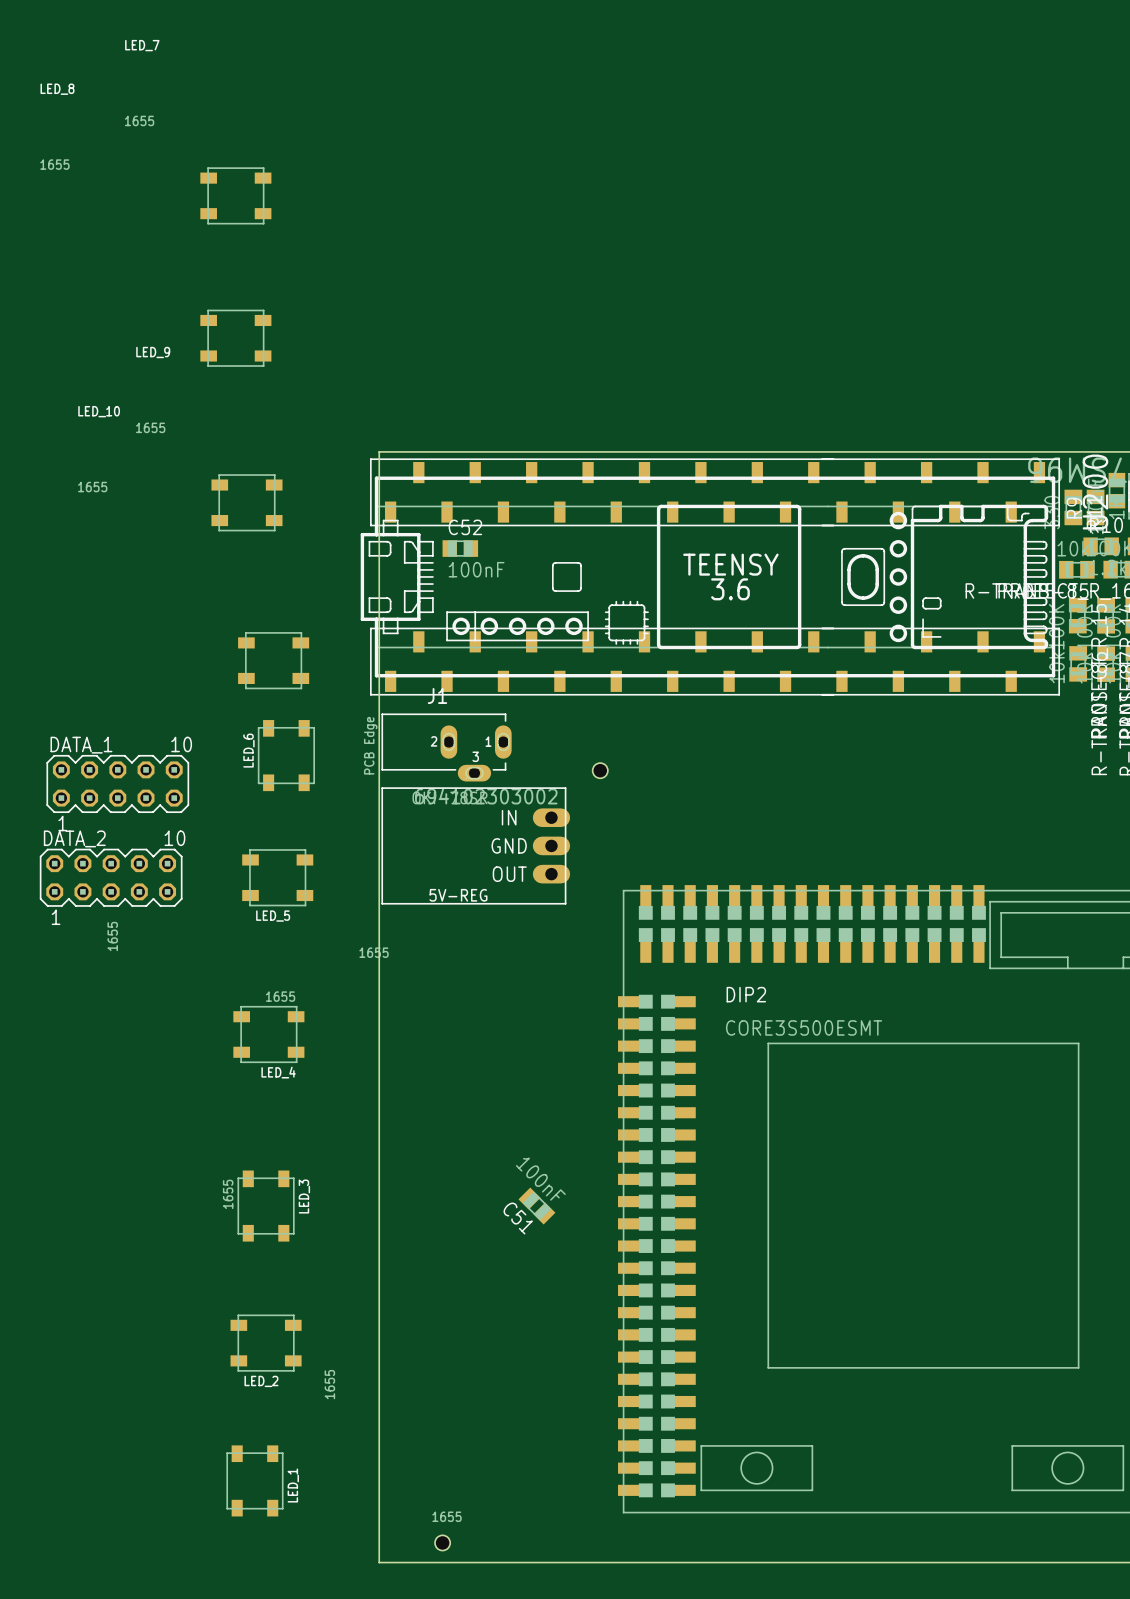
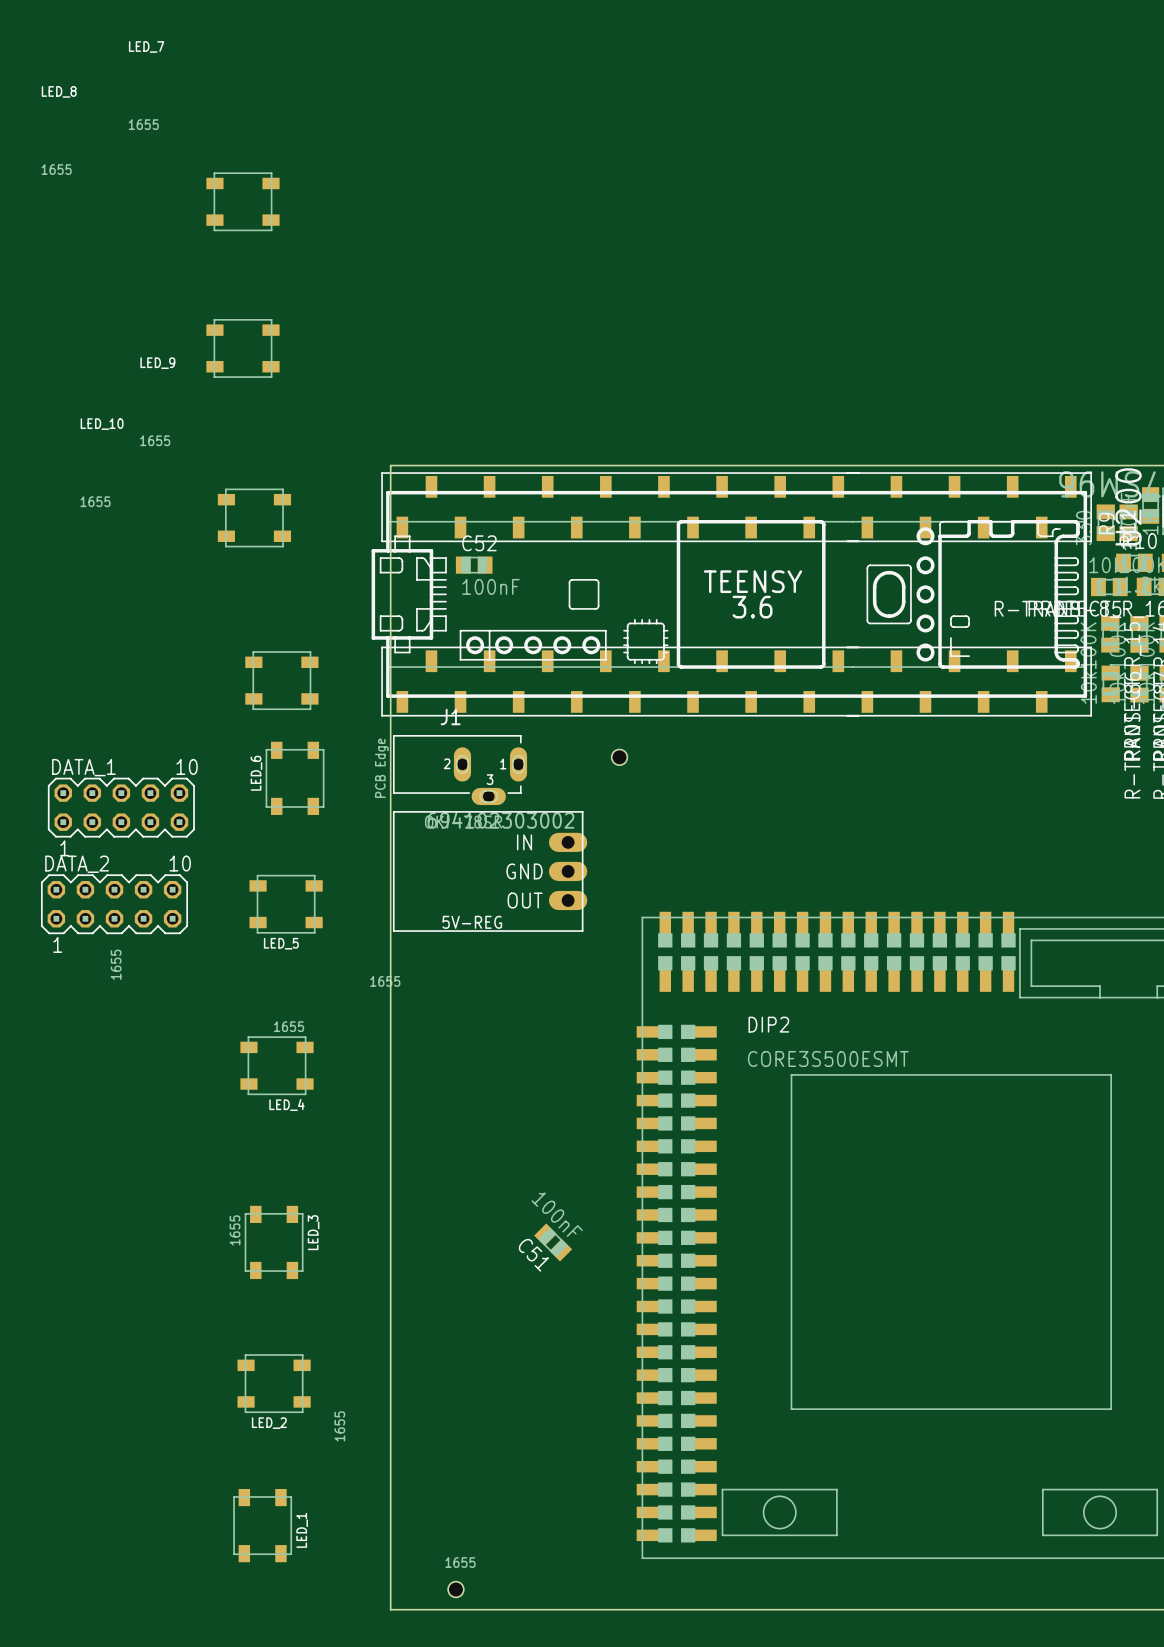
hole position: (600, 770) -> (619, 757)

